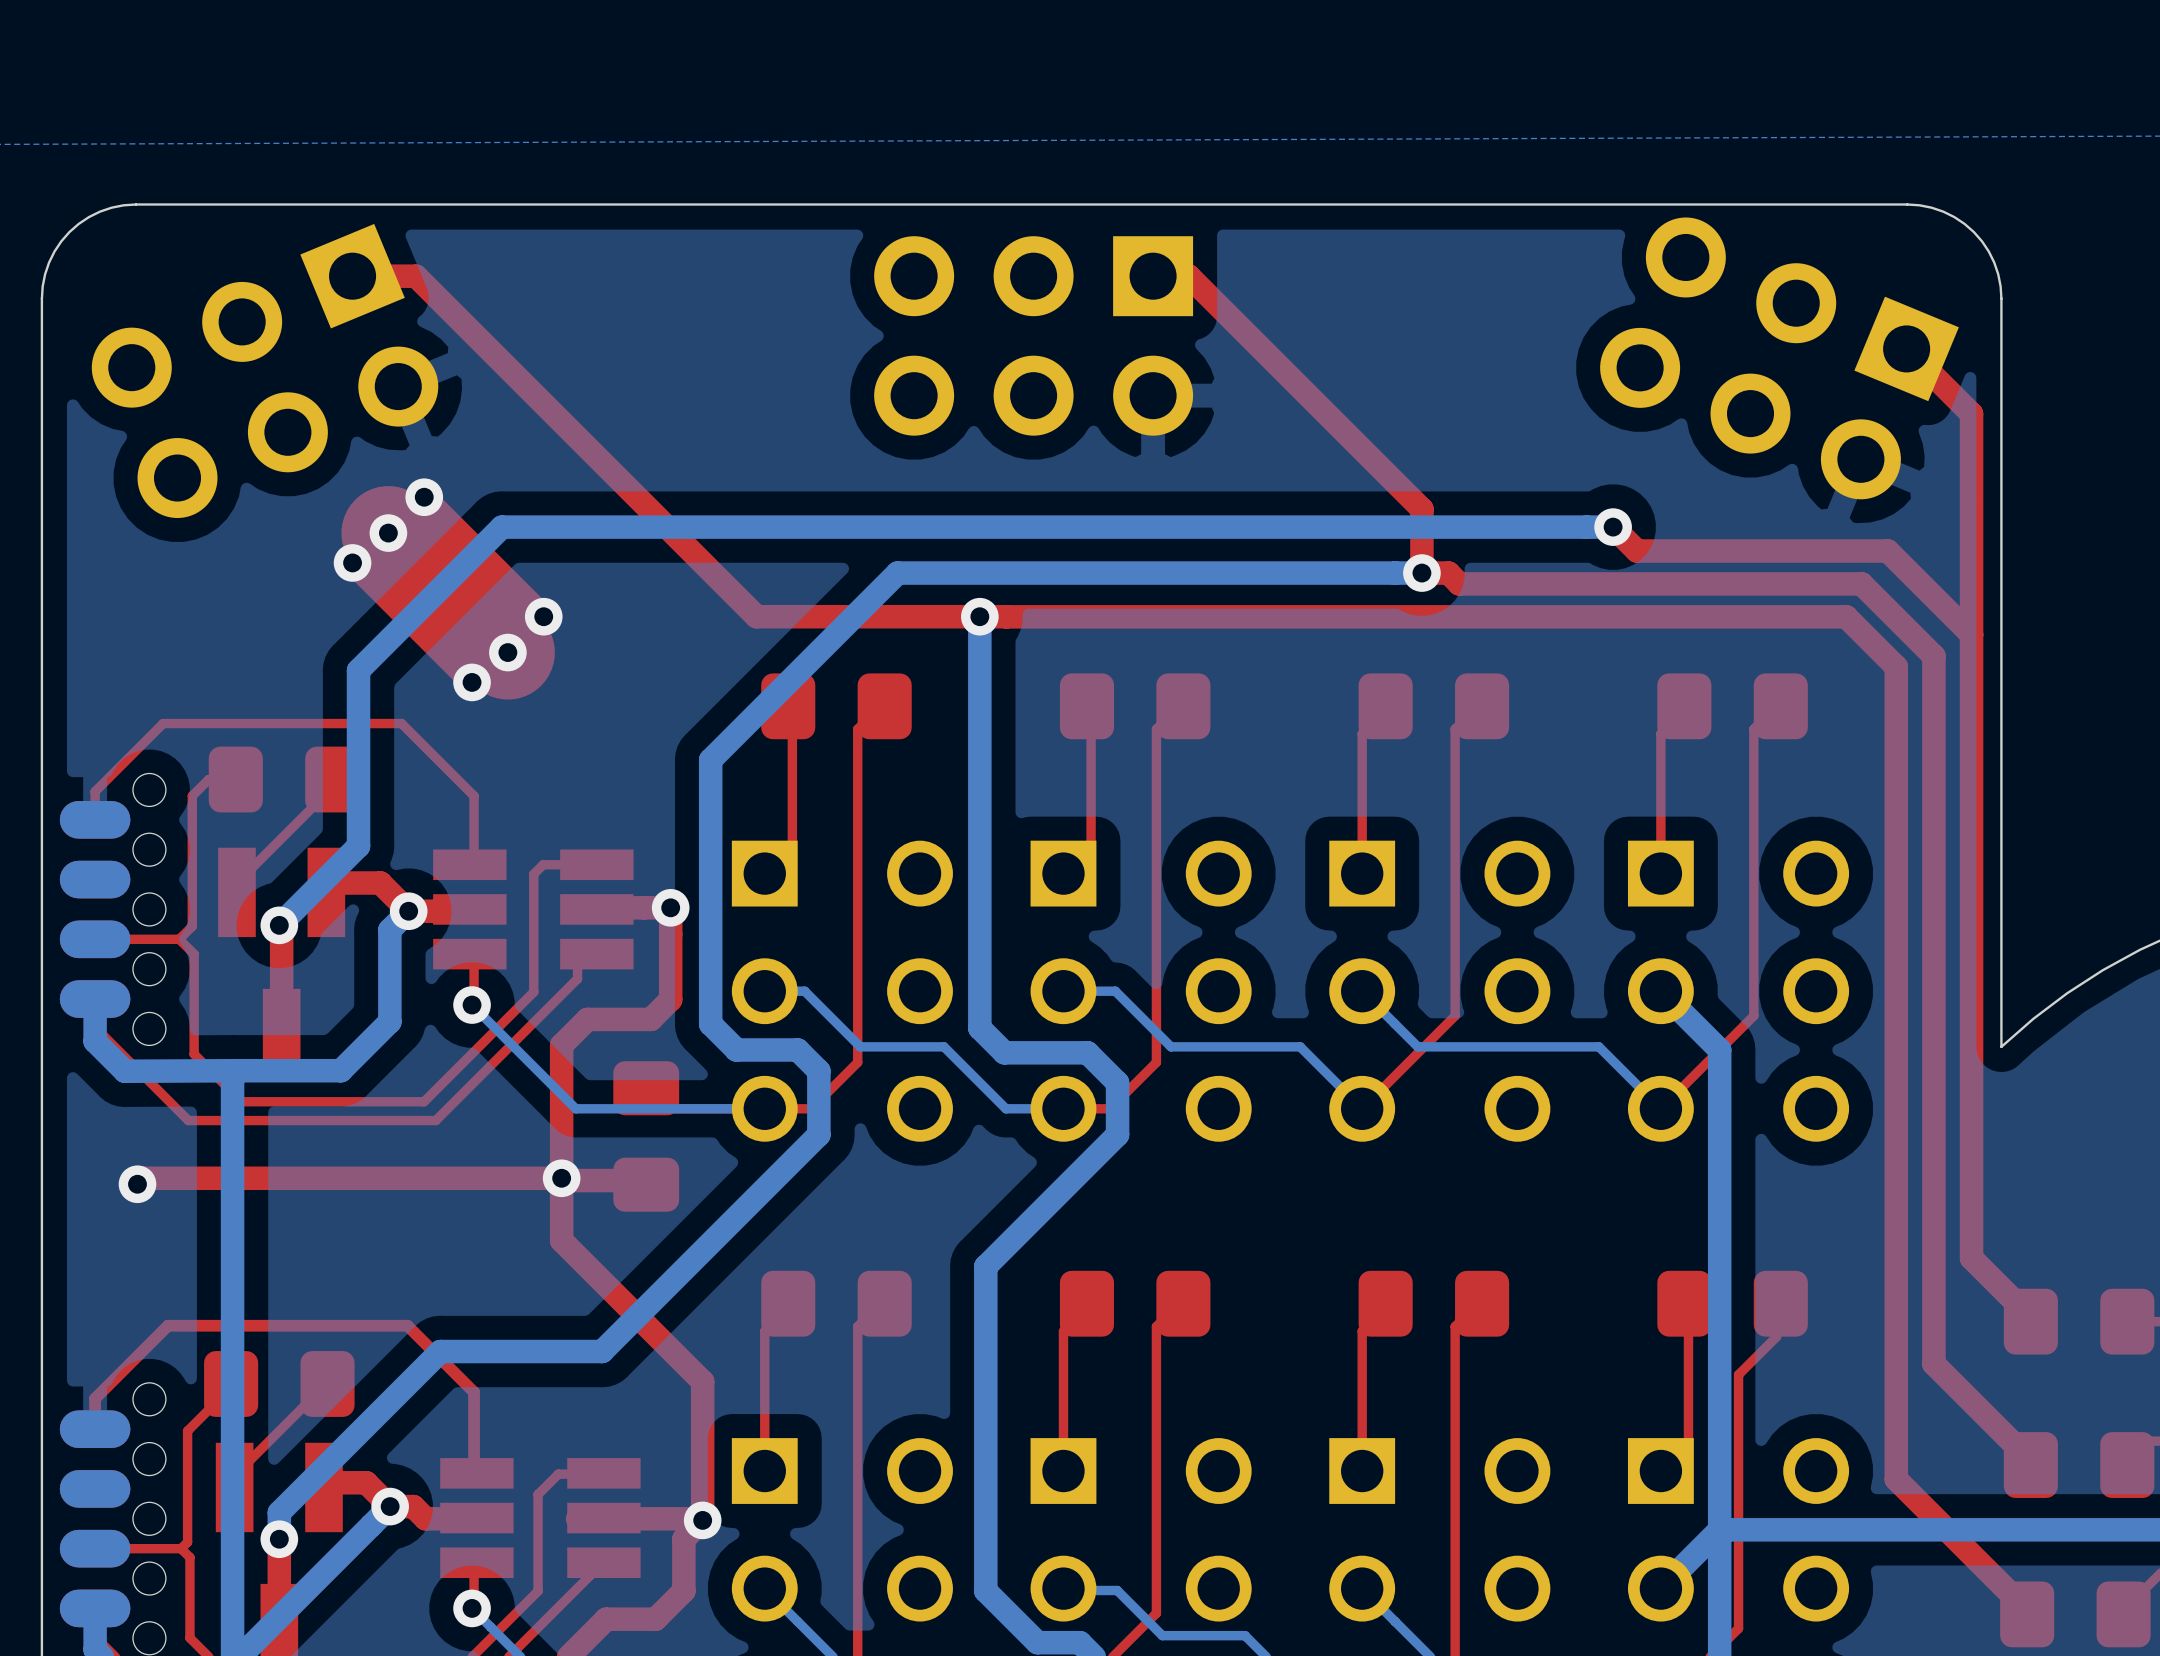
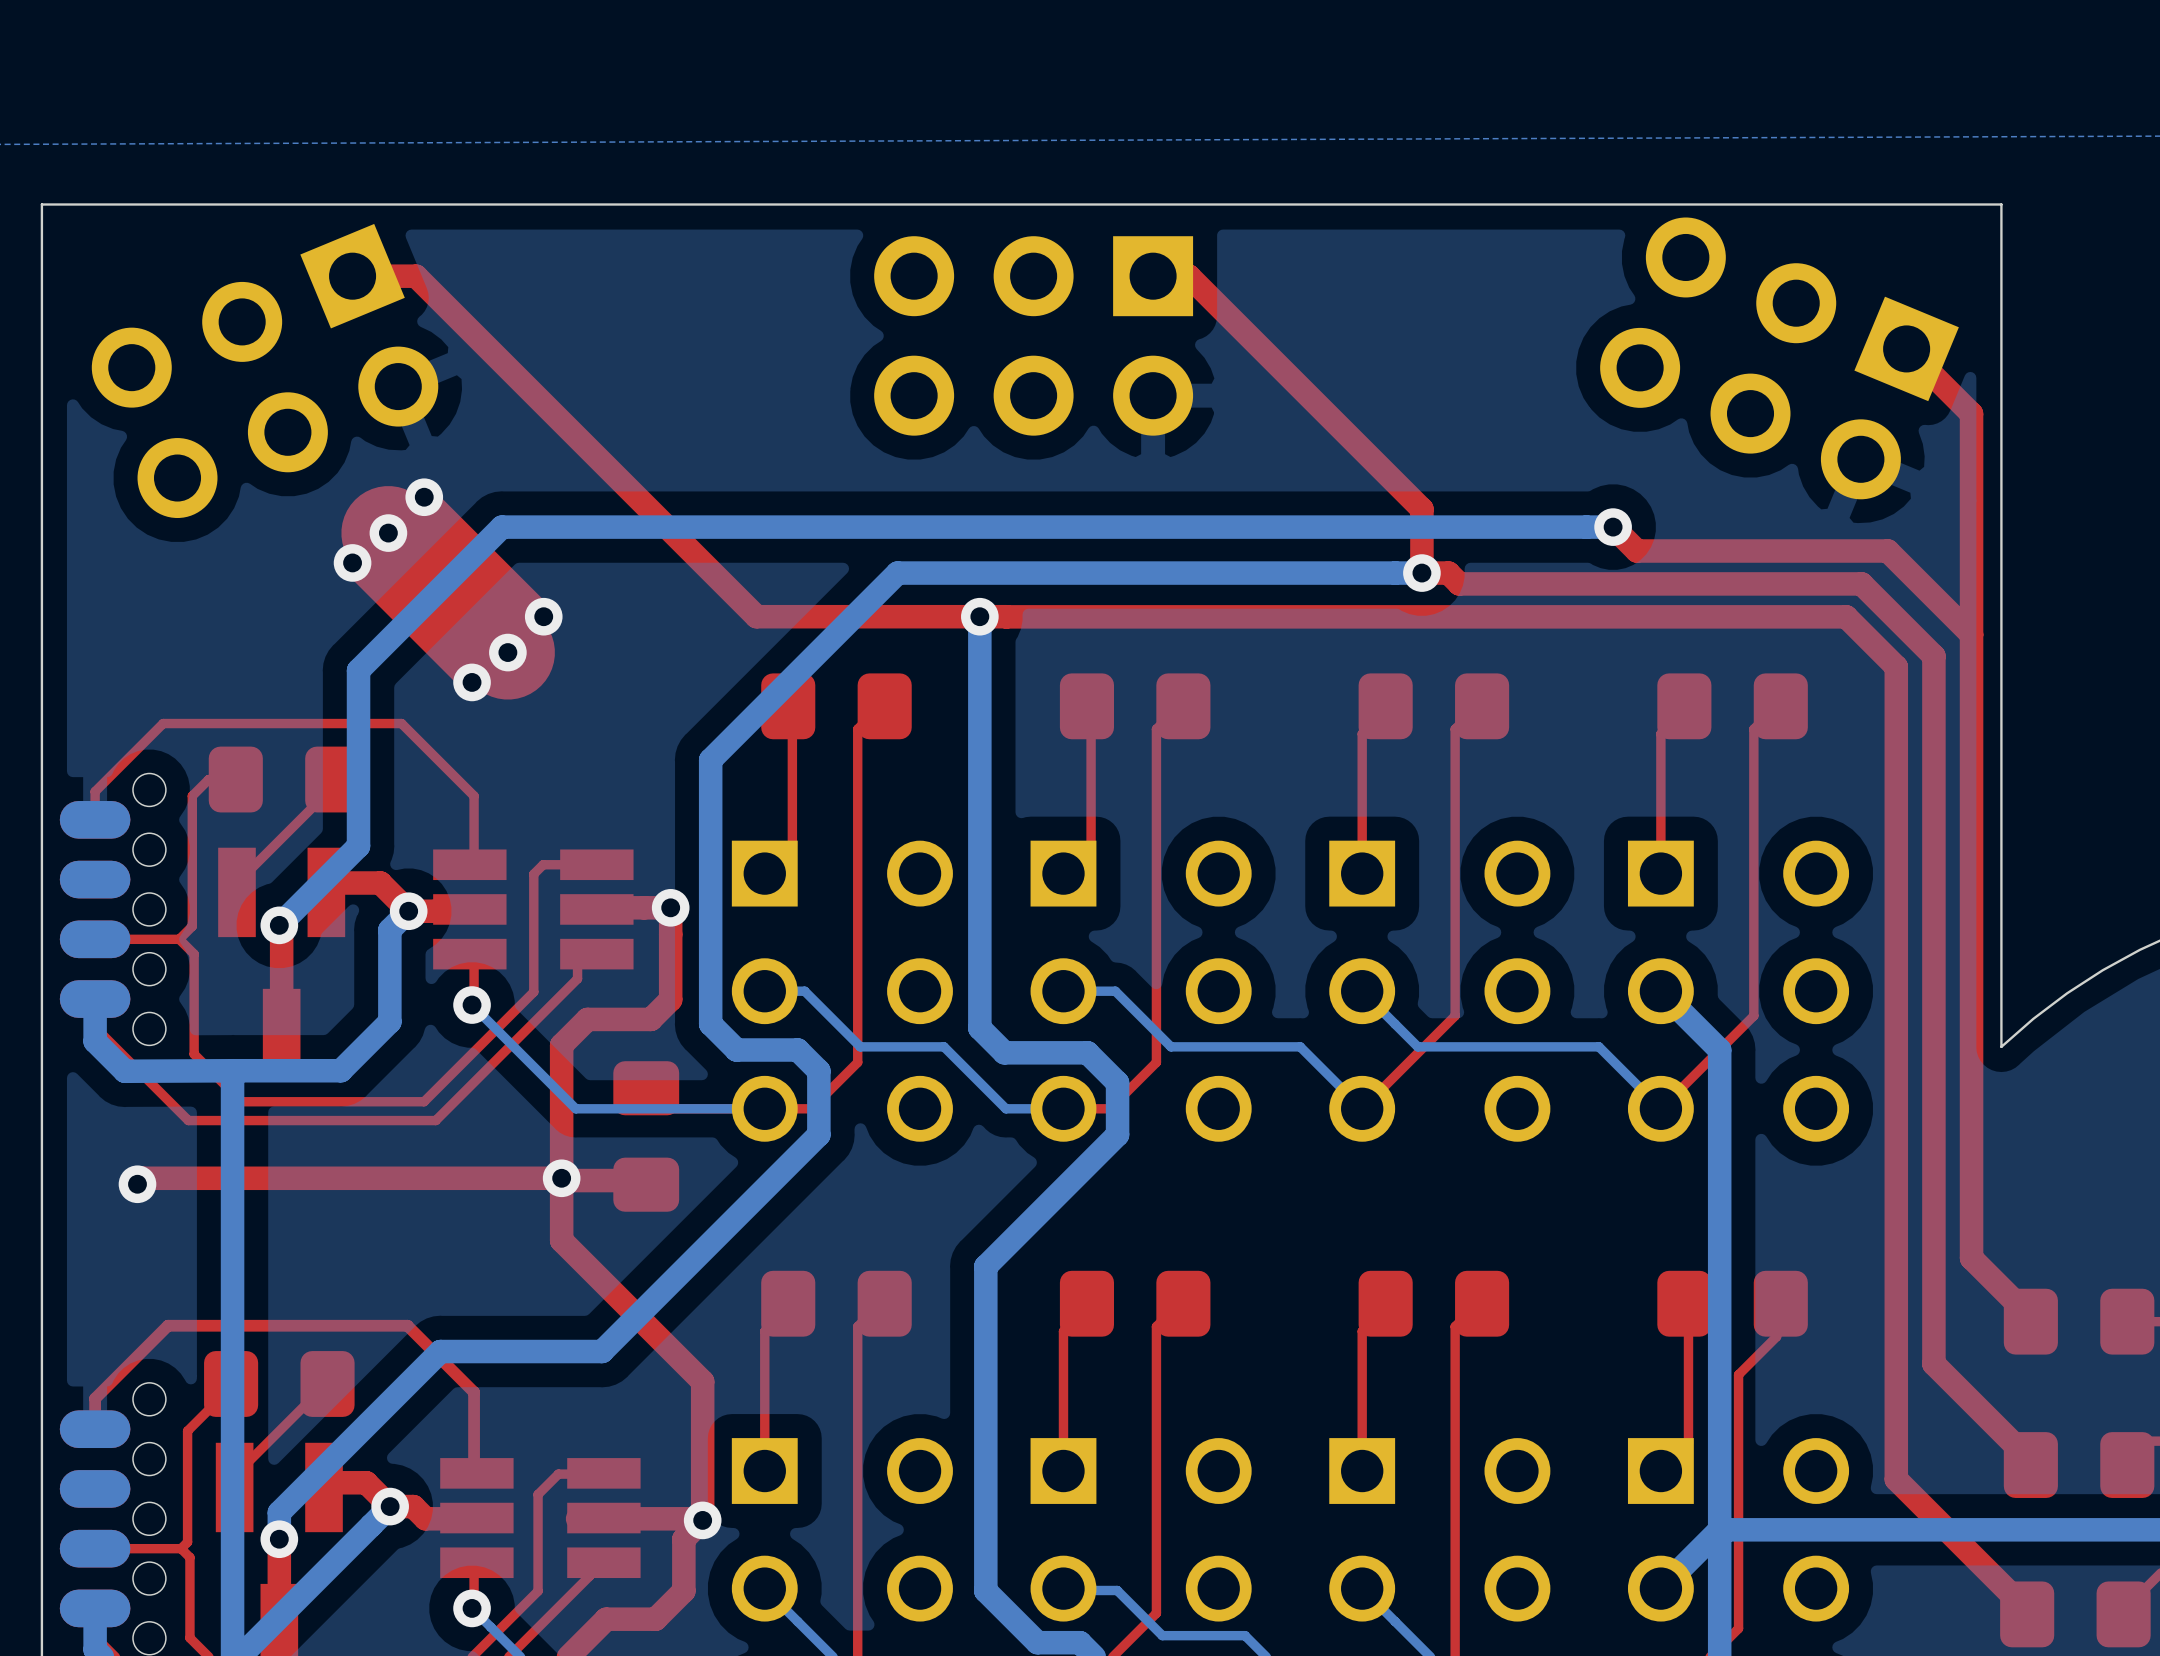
board edge: (135, 204) (111, 207) (99, 211) (78, 223) (69, 232) (61, 241) (49, 262) (42, 286) (41, 298) -> (135, 204) (41, 204) (41, 298)
board edge: (1907, 204) (1931, 207) (1943, 211) (1964, 223) (1973, 232) (1981, 241) (1994, 262) (2000, 286) (2001, 298) -> (1907, 204) (2001, 204) (2001, 298)

